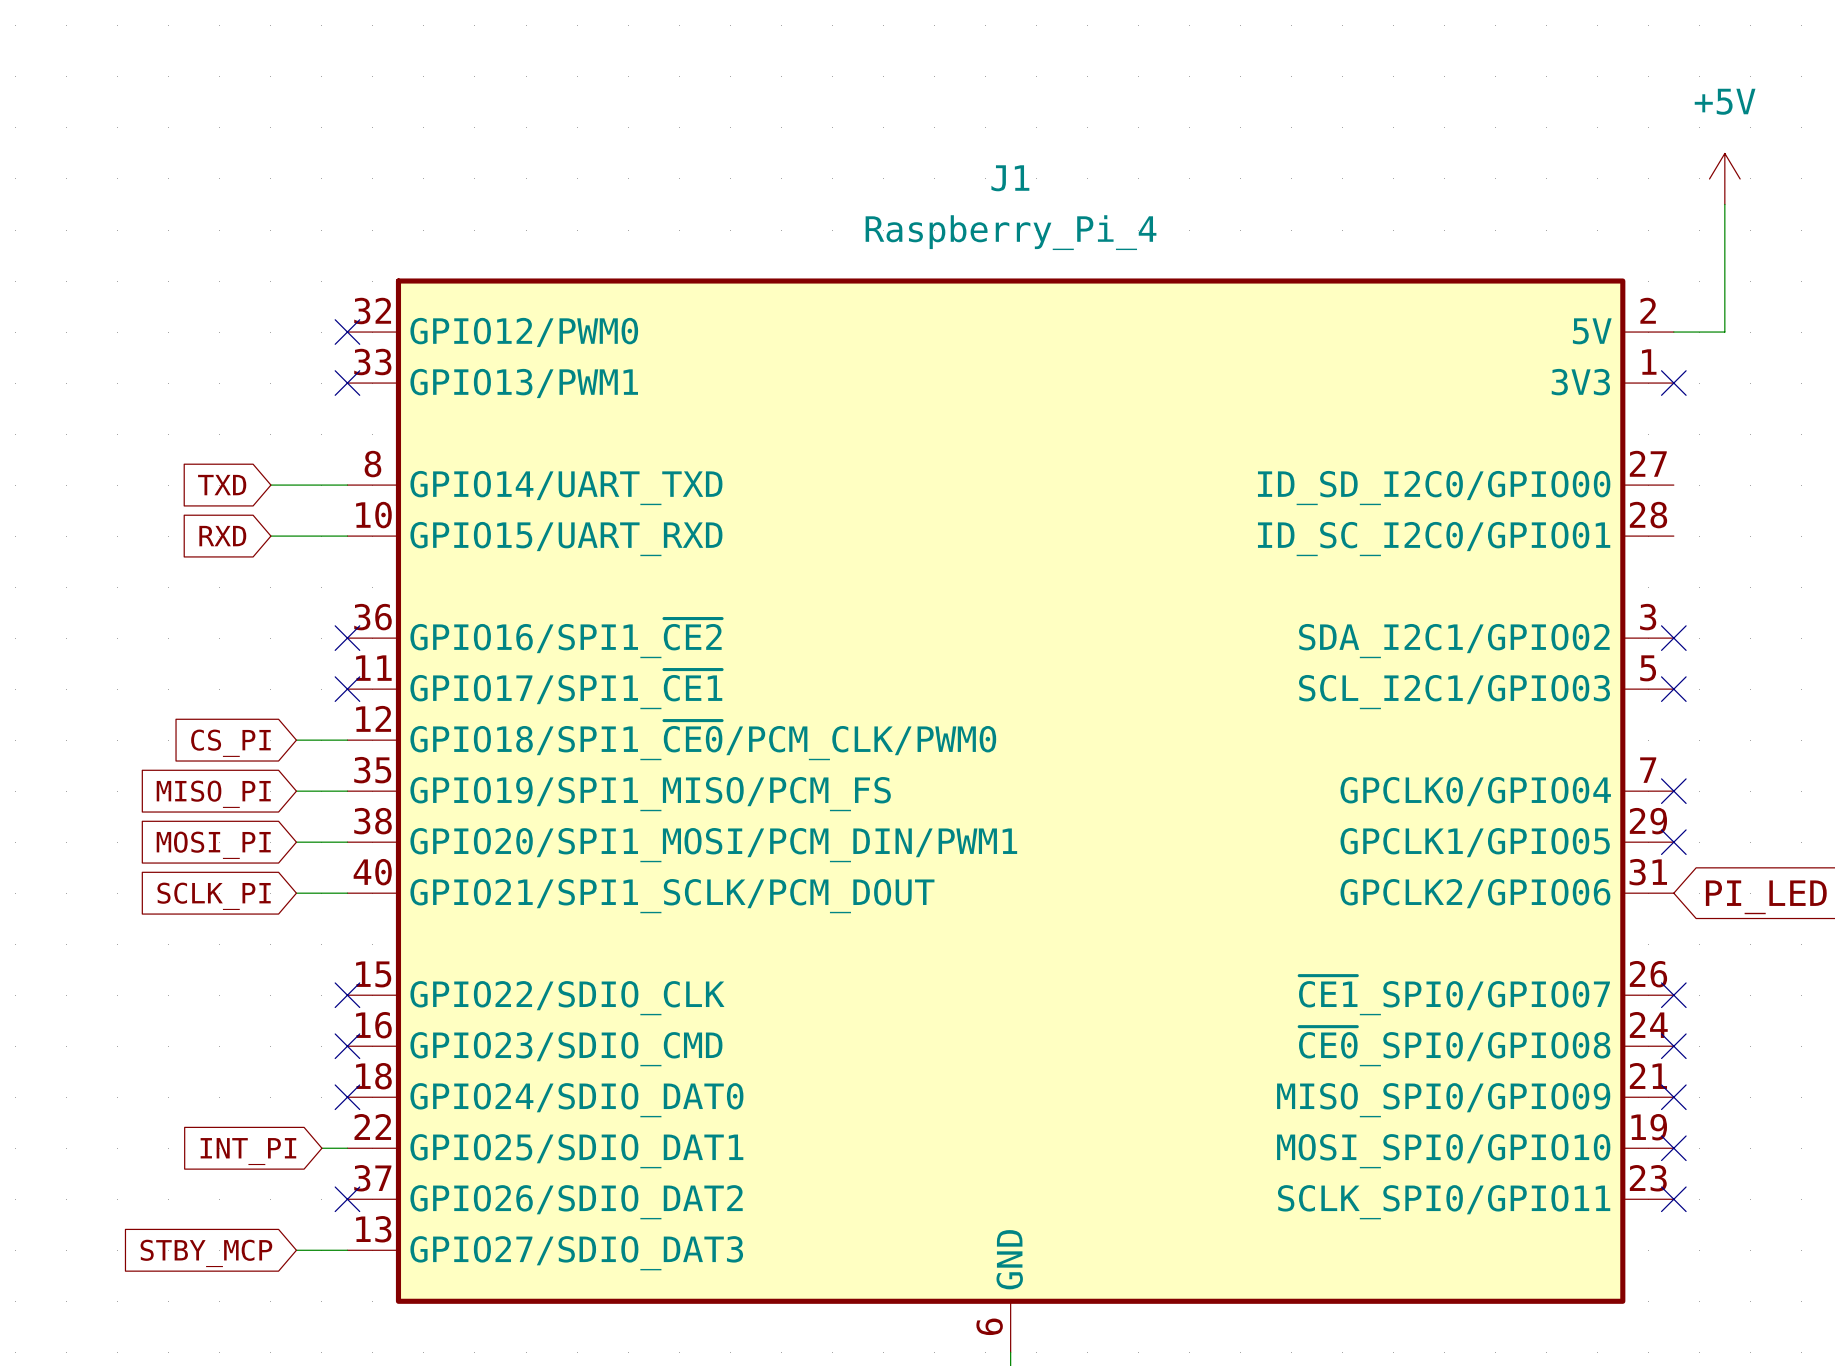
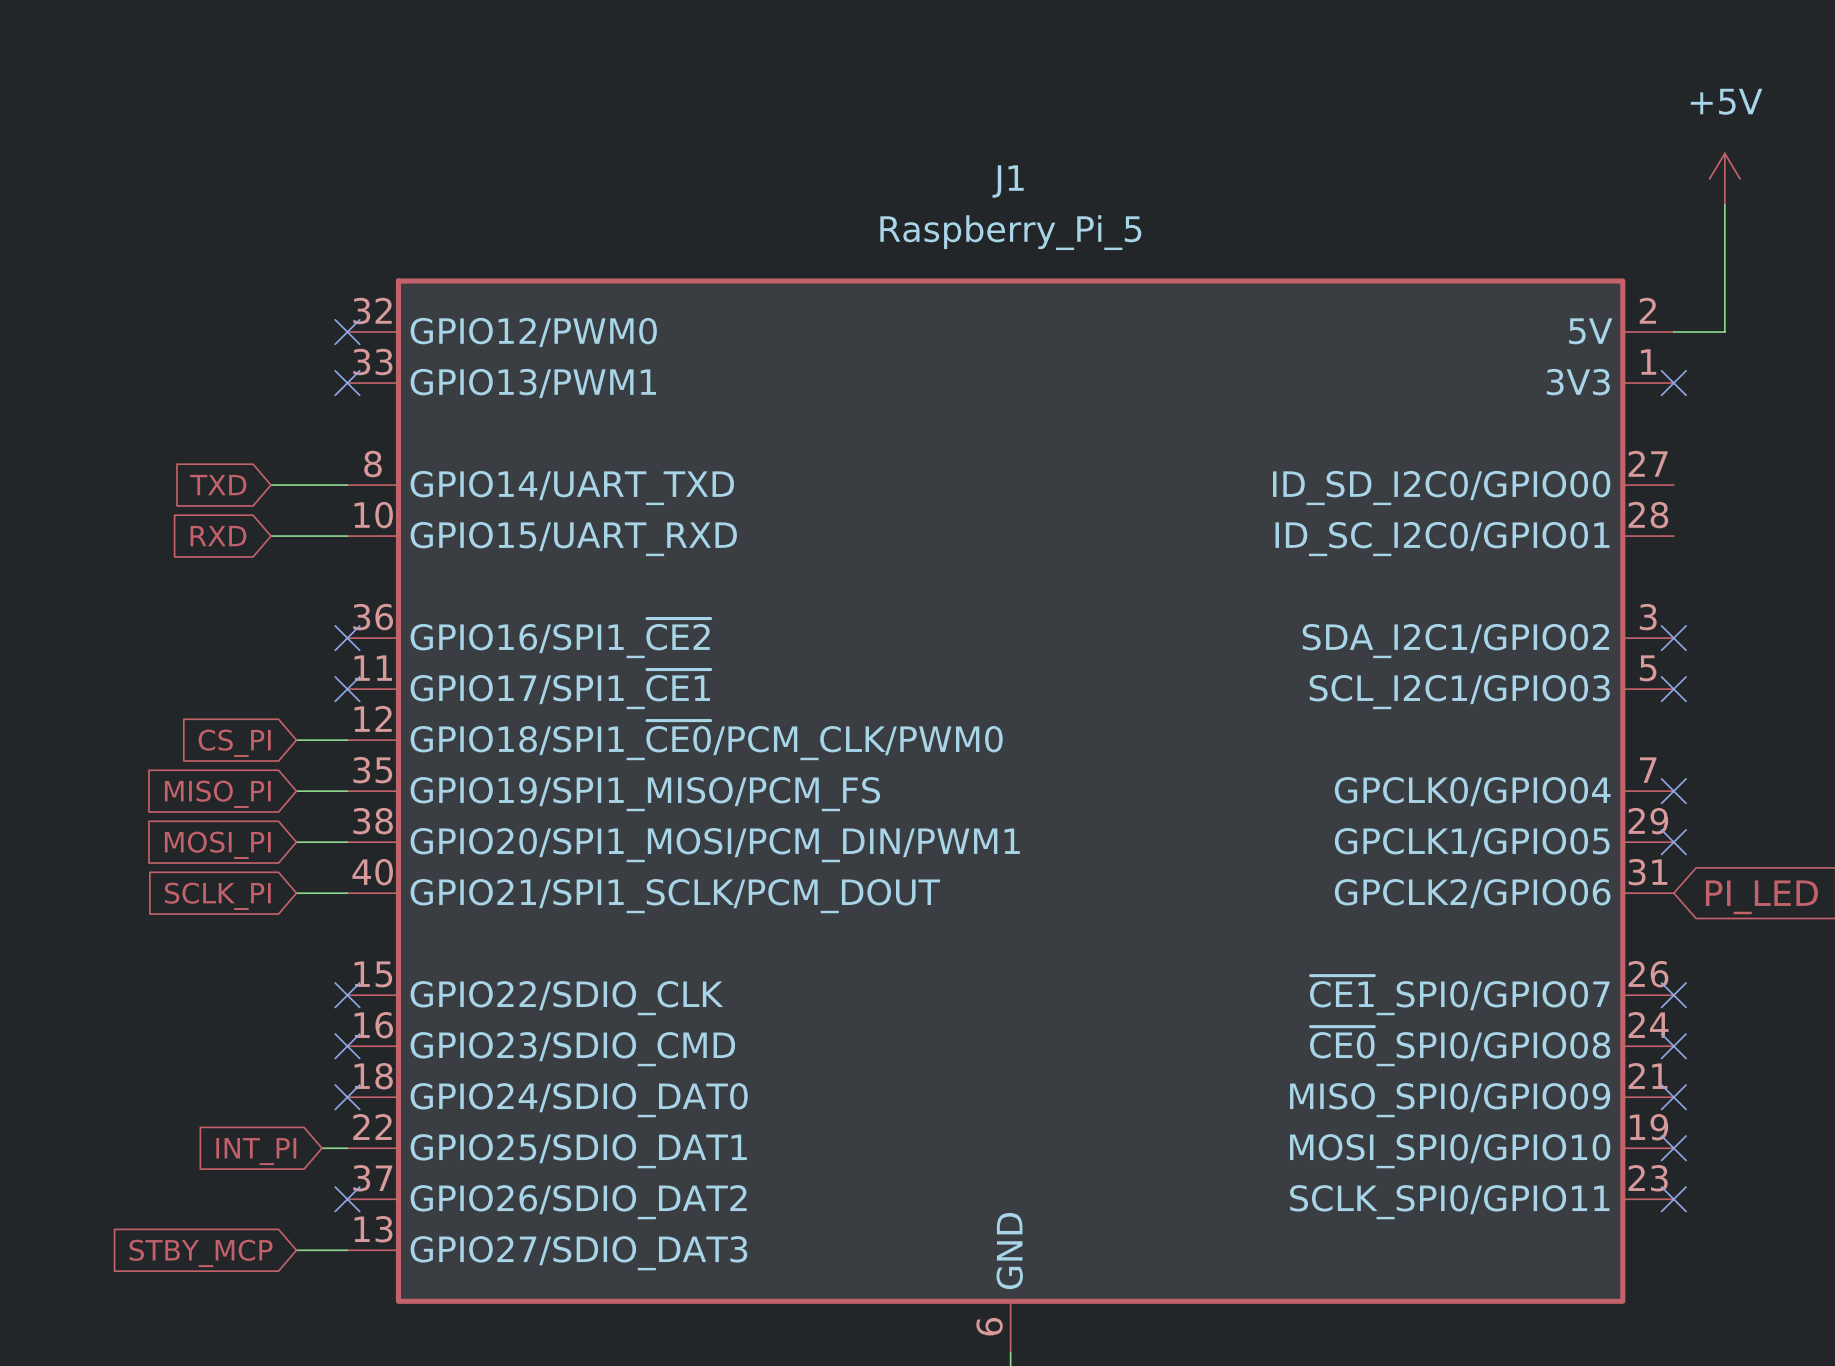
J1 value: Raspberry_Pi_4 (1011, 232) -> Raspberry_Pi_5 (1010, 232)

